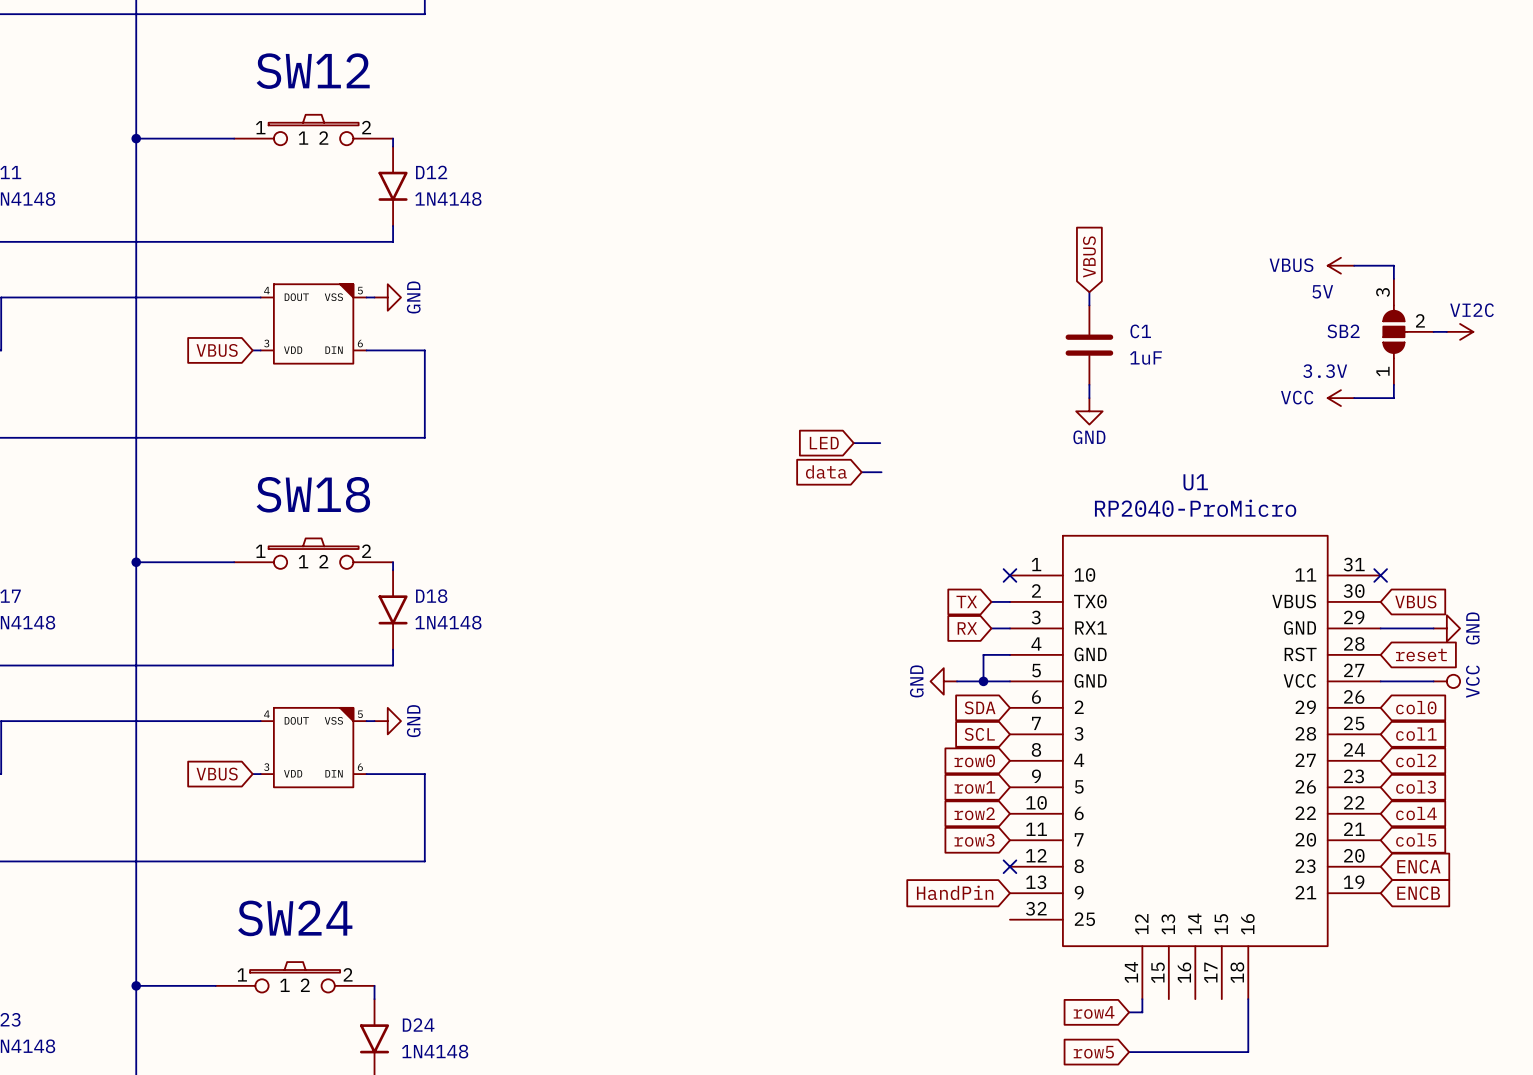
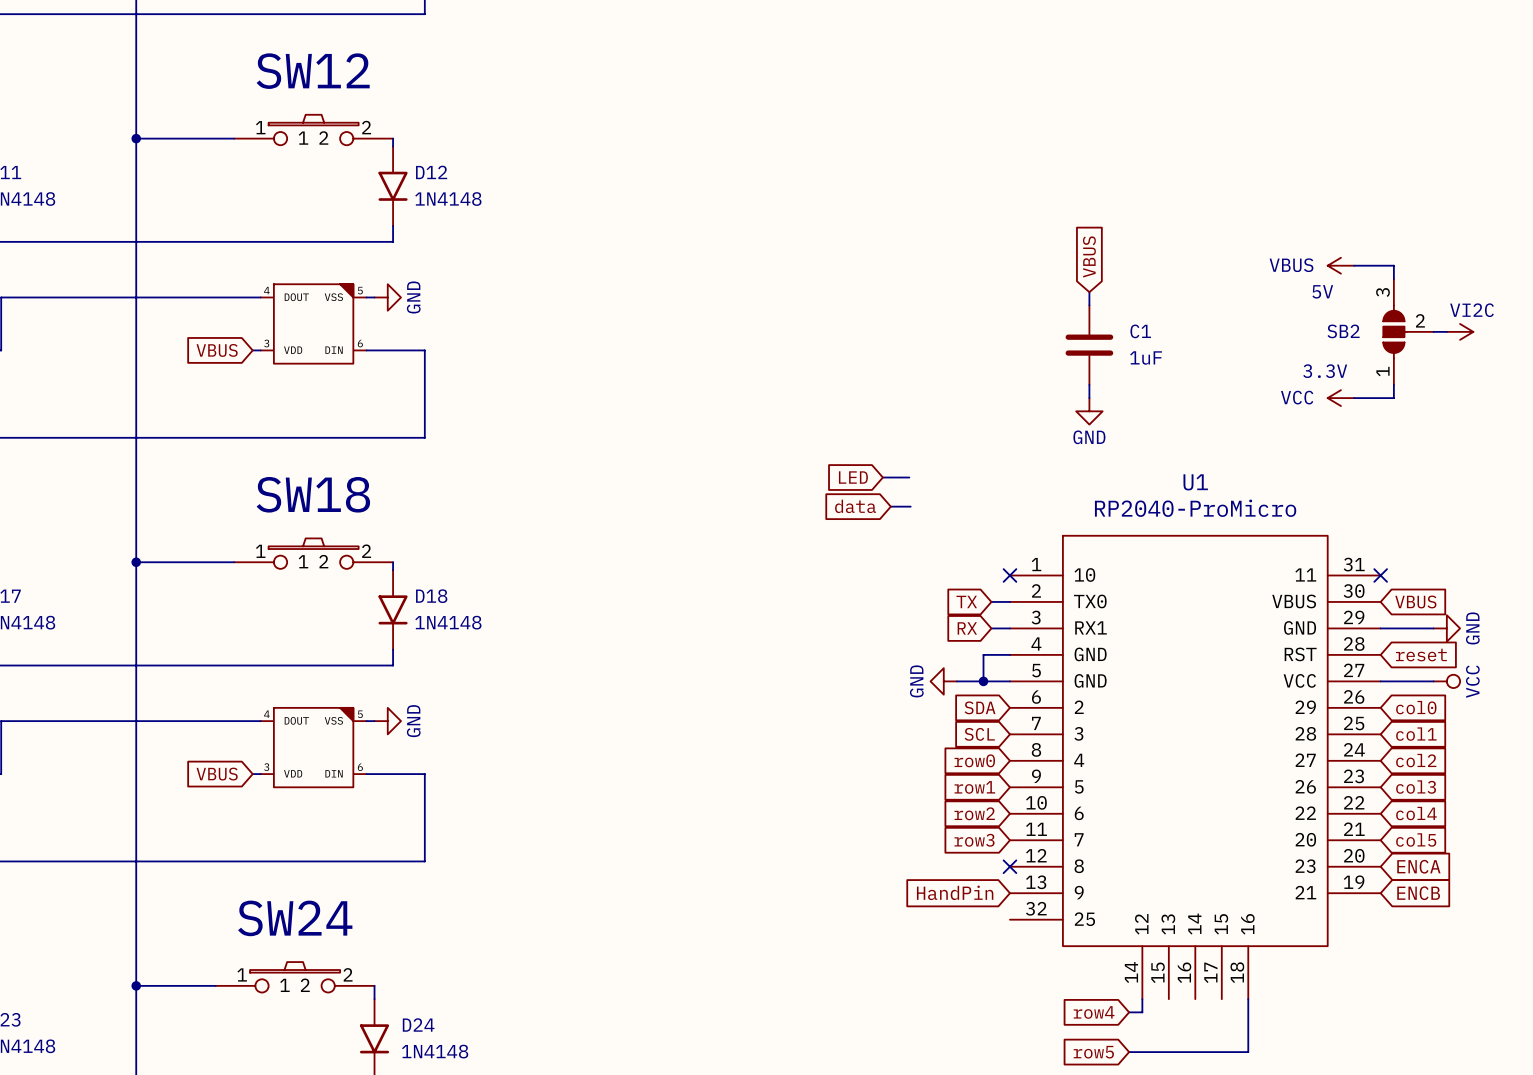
global label position: LED (824, 443) -> LED (853, 477)
wire: (853, 443) (880, 443) -> (882, 477) (909, 477)
global label position: data (826, 471) -> data (855, 506)
wire: (861, 472) (881, 472) -> (890, 506) (910, 506)

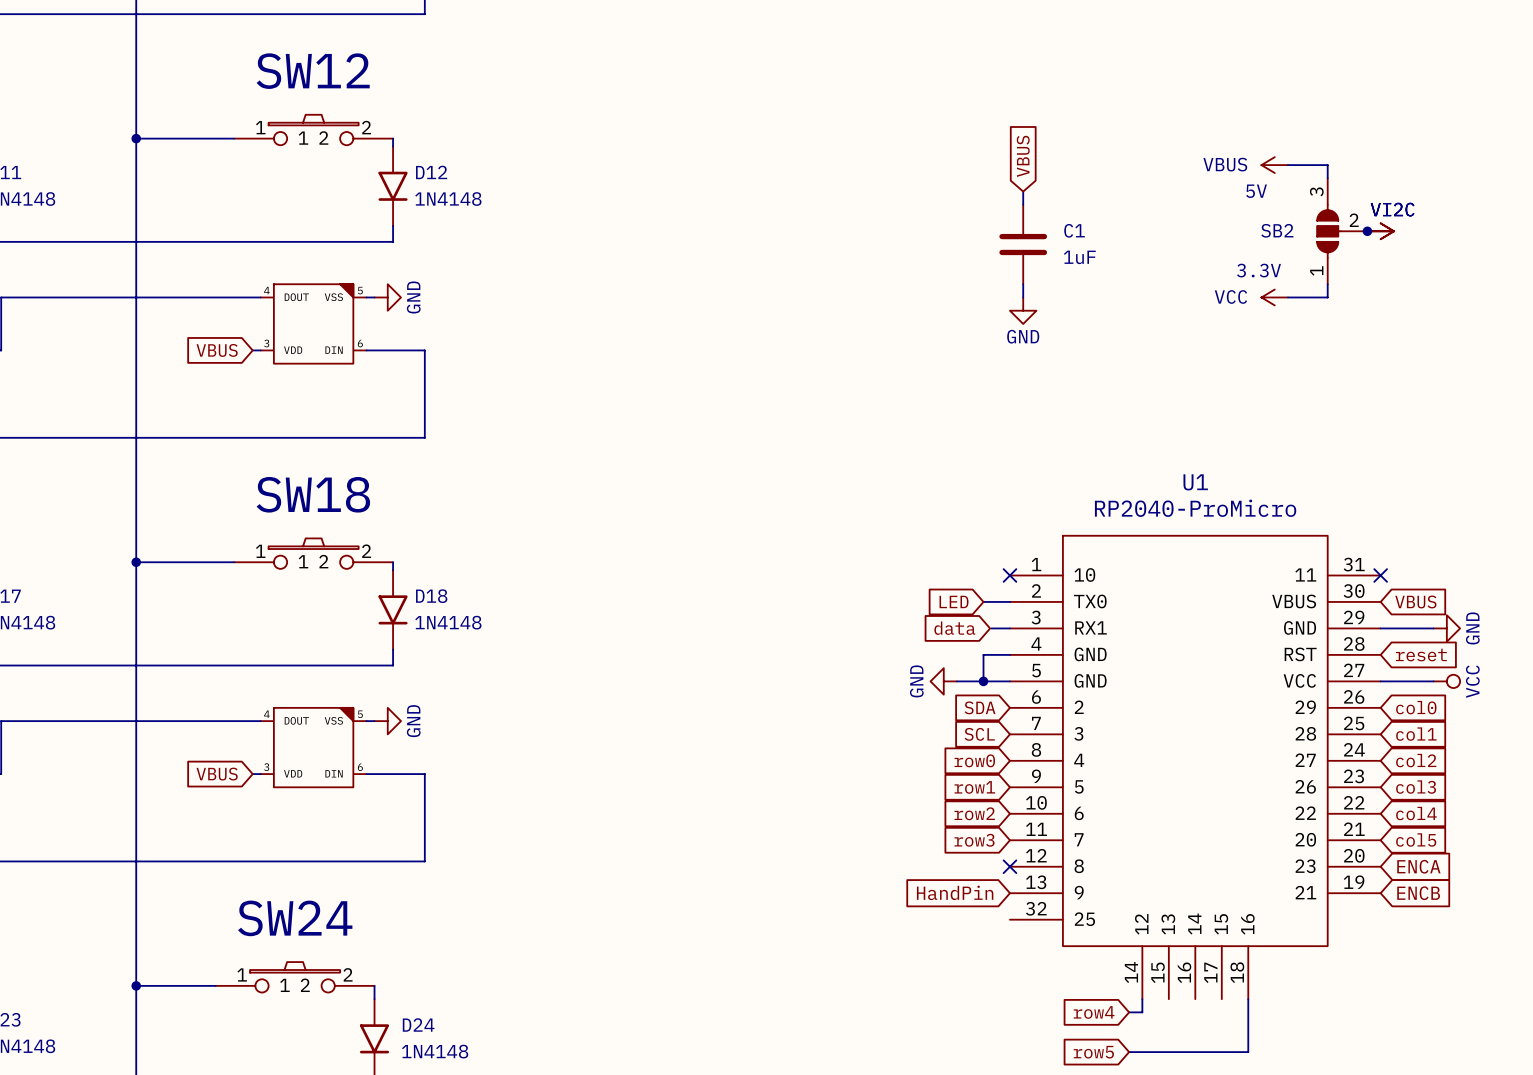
junction: none -> (1367, 231)
global label position: VBUS (1089, 256) -> VBUS (1023, 156)
power symbol position: VBUS (1340, 265) -> VBUS (1274, 165)
wire: (1354, 265) (1393, 265) (1393, 278) -> (1287, 165) (1327, 165) (1327, 178)
text position: 5V (1322, 291) -> 5V (1256, 191)
wire: (1089, 292) (1089, 305) -> (1023, 191) (1023, 204)
SB2 position: (1408, 331) -> (1342, 231)
wire: (1433, 331) (1446, 331) -> none
power symbol position: VI2C (1460, 331) -> VI2C (1380, 231)
C1 position: (1089, 345) -> (1023, 244)
text position: 3.3V (1325, 371) -> 3.3V (1258, 270)
wire: (1089, 384) (1089, 398) -> (1023, 284) (1023, 297)
wire: (1393, 384) (1393, 398) (1354, 398) -> (1327, 284) (1327, 297) (1287, 297)
power symbol position: VCC (1340, 398) -> VCC (1274, 297)
power symbol position: GND (1089, 411) -> GND (1023, 310)
global label position: LED (853, 477) -> LED (954, 601)
wire: (882, 477) (909, 477) -> none
global label position: data (855, 506) -> data (954, 628)
wire: (890, 506) (910, 506) -> none
global label: TX (966, 601) -> none
wire: none -> (983, 601) (991, 601)
global label: RX (967, 628) -> none

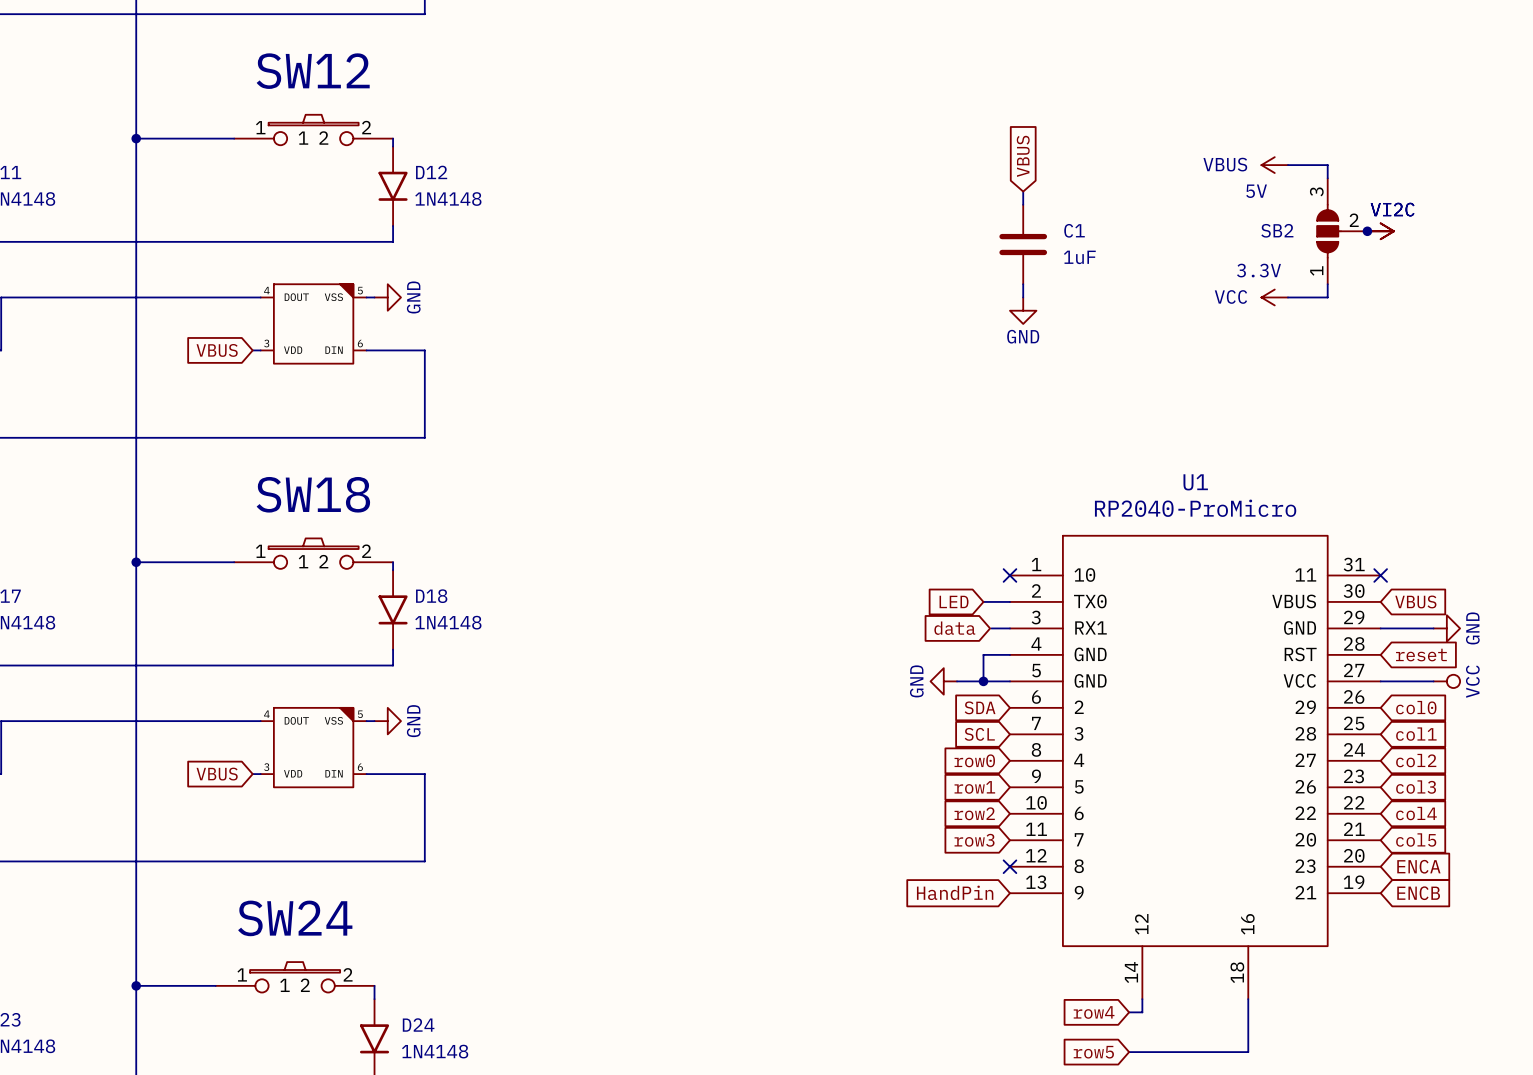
U1 symbol: [1009, 535, 1381, 1000] -> [1009, 535, 1381, 1000]

